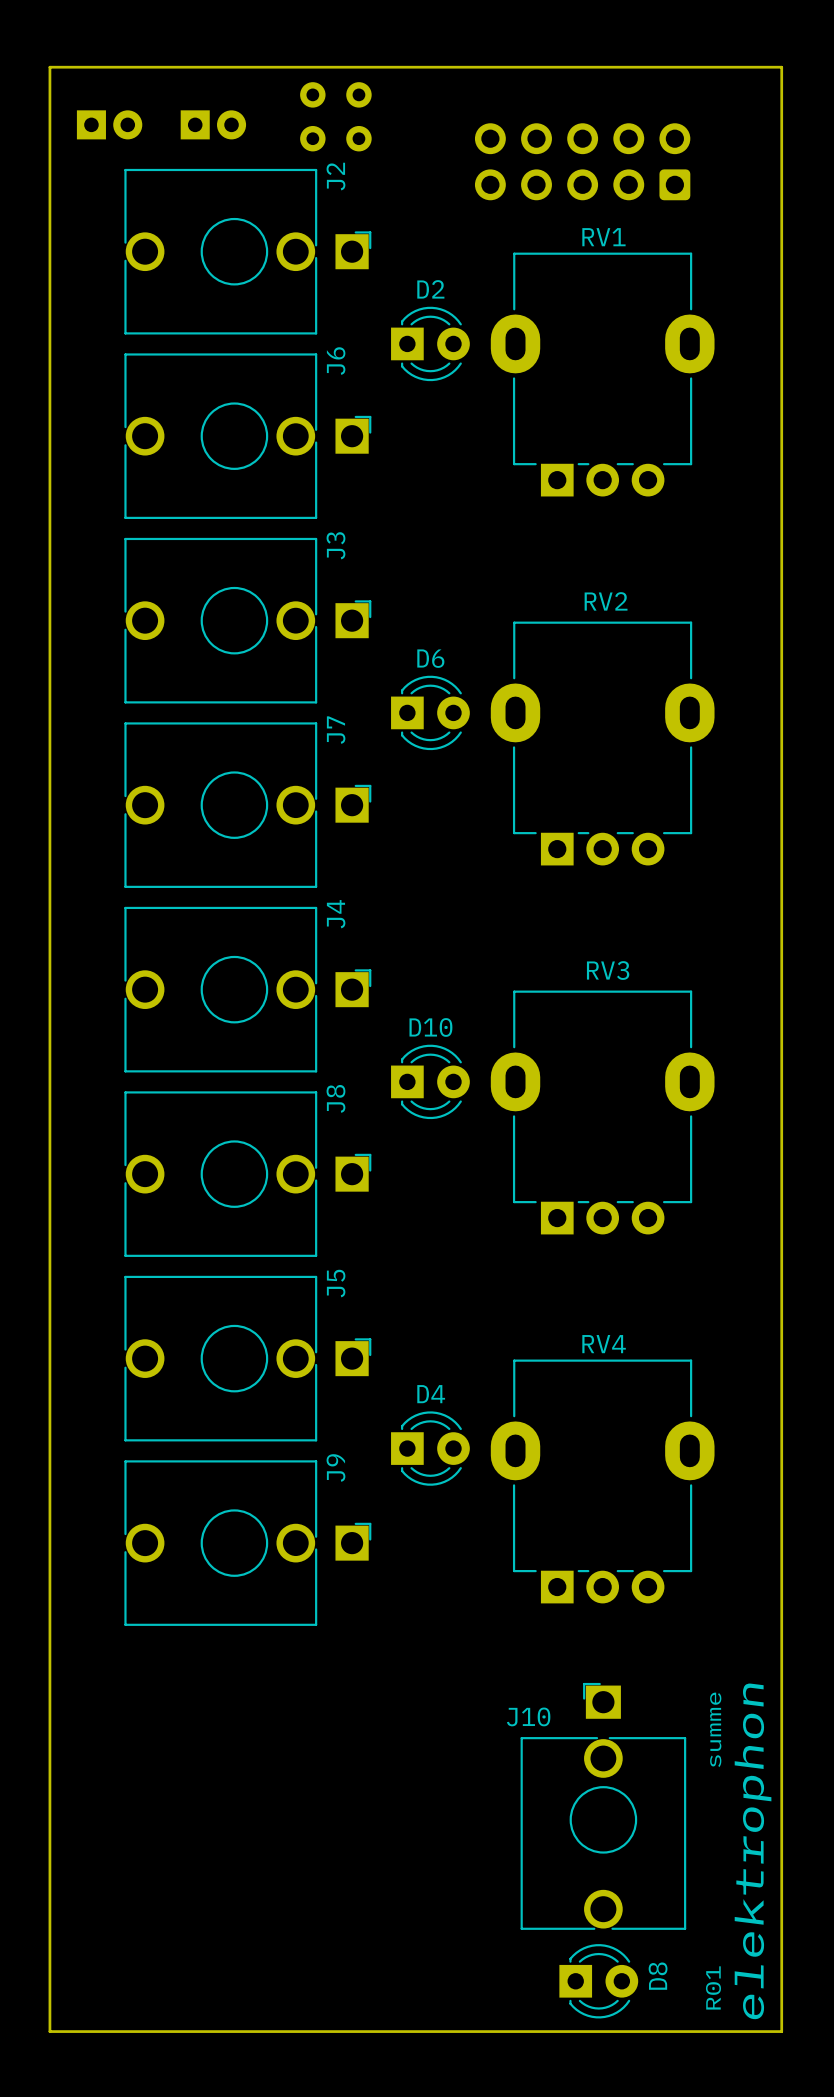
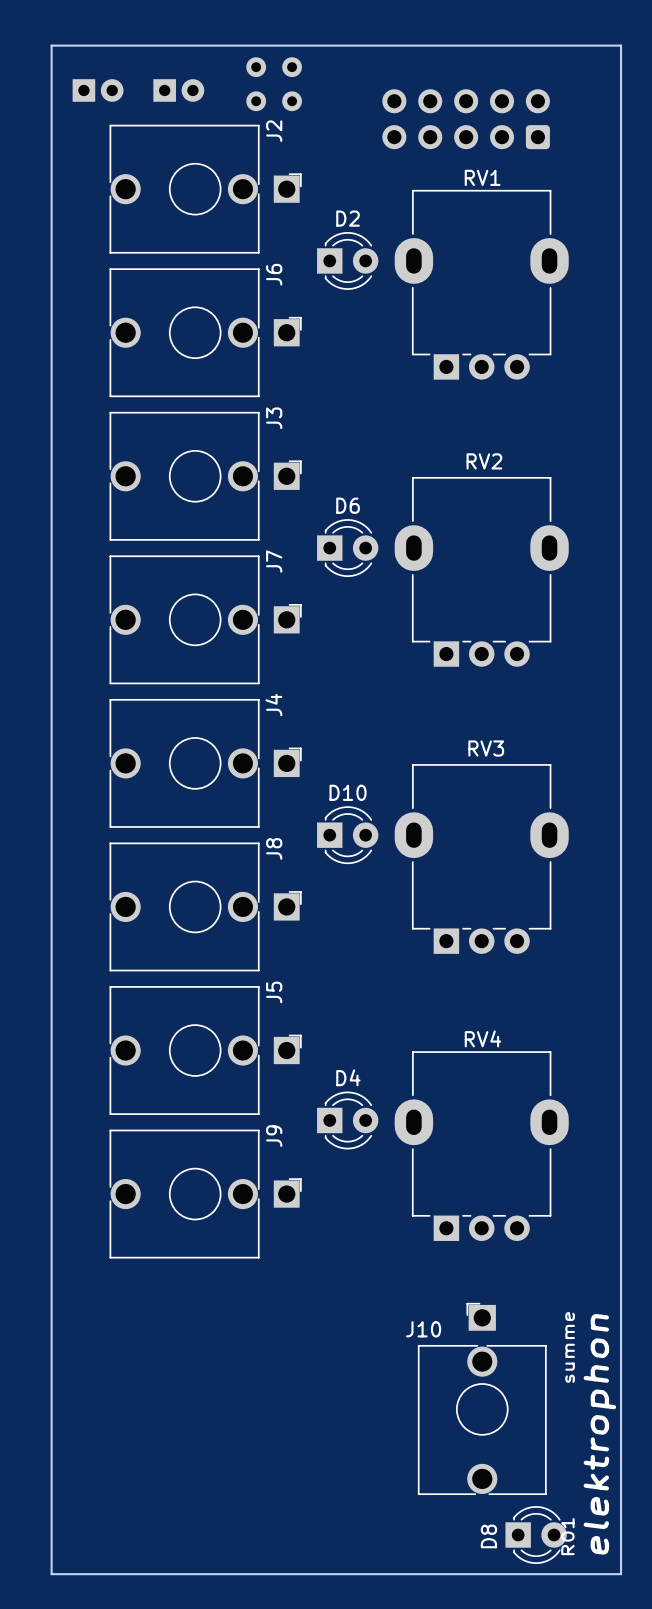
D8 name position: D8 (658, 1976) -> D8 (488, 1536)
D8 position: (598, 1981) -> (536, 1535)

